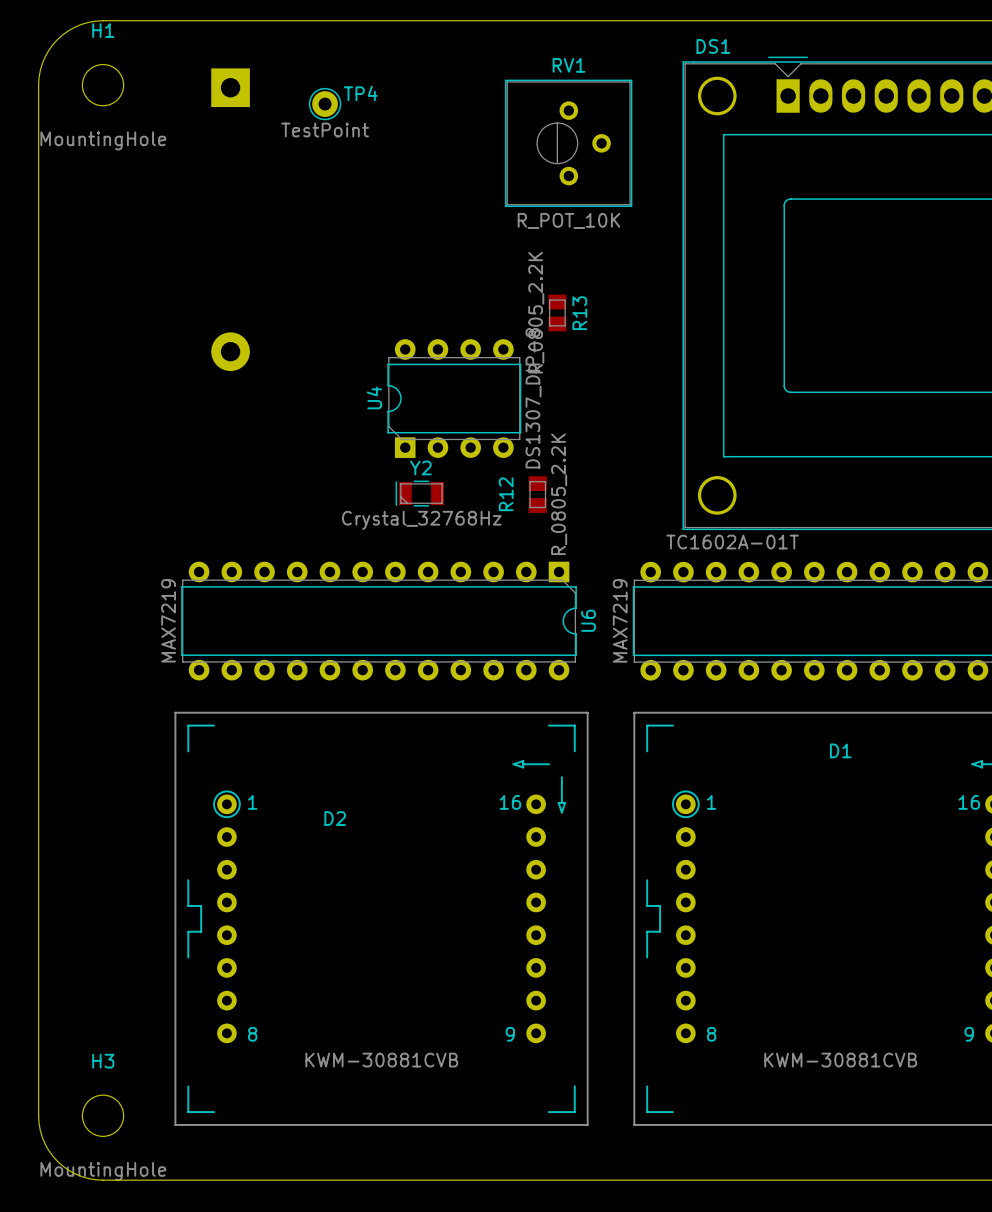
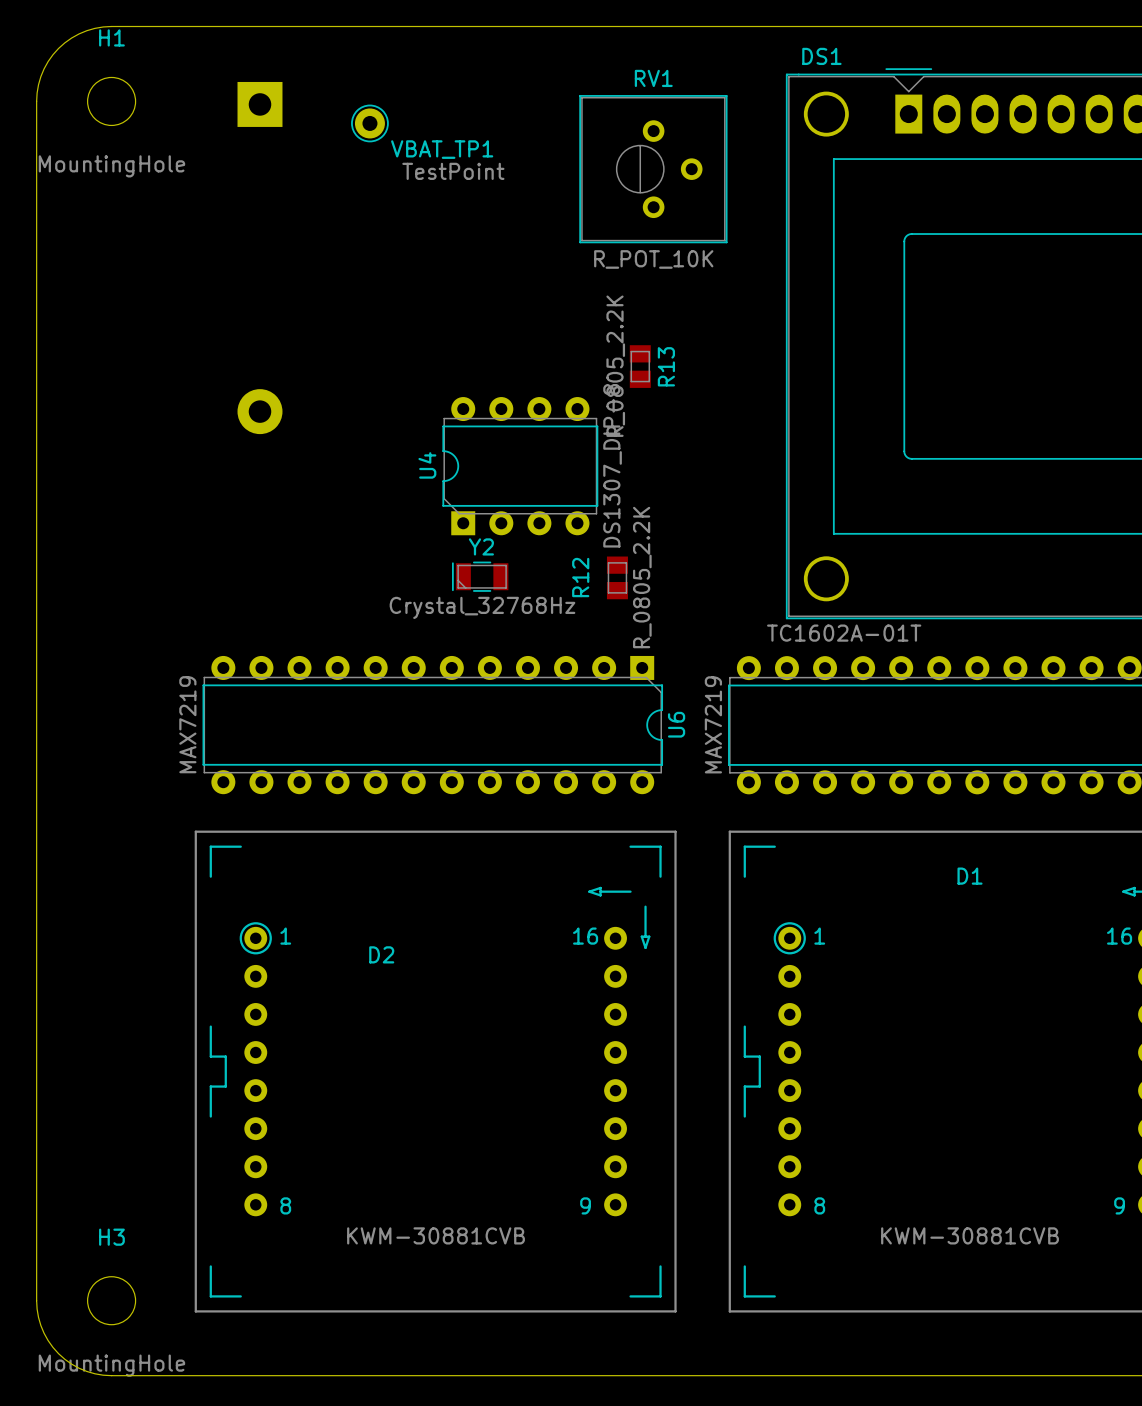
TP4 name: TP4 (360, 93) -> VBAT_TP1 (442, 149)
TP4 value position: TestPoint (325, 129) -> TestPoint (453, 171)

